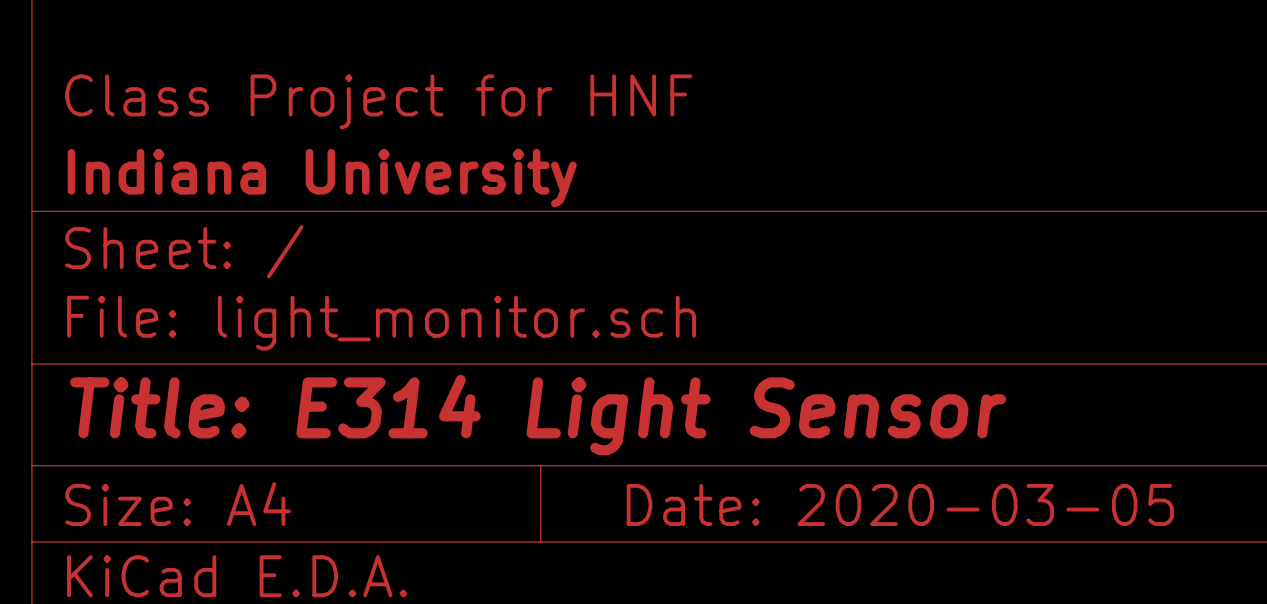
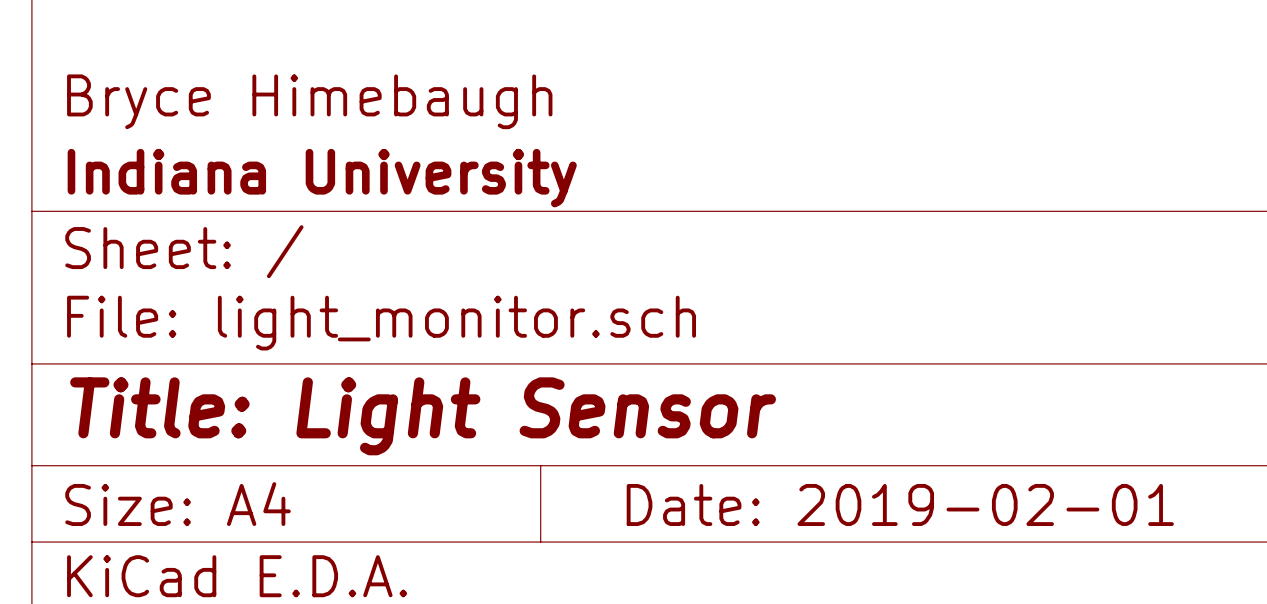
title block: Class Project for HNF (378, 101) -> Bryce Himebaugh (309, 101)
title block: Title: E314 Light Sensor (538, 415) -> Title: Light Sensor (423, 416)
title block: Date: 2020-03-05 (900, 504) -> Date: 2019-02-01 (900, 504)

